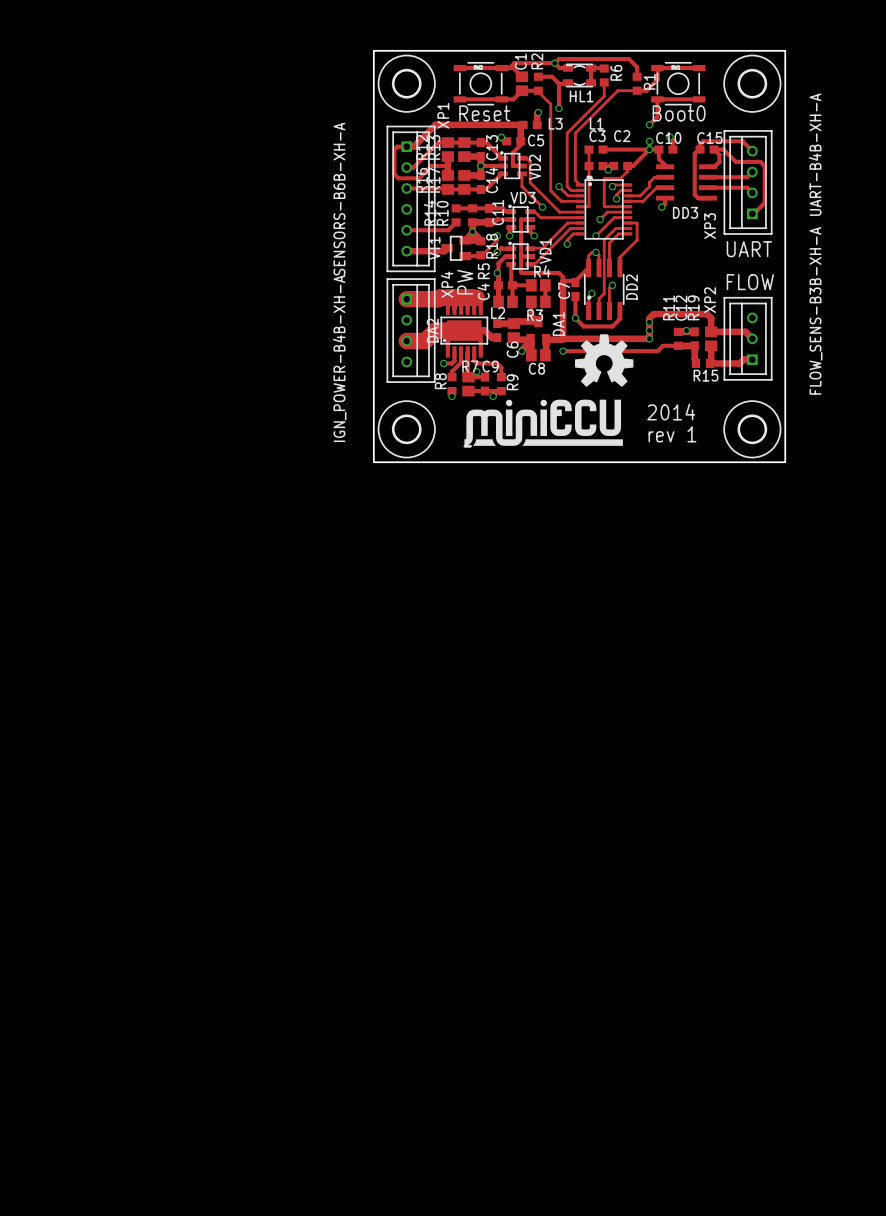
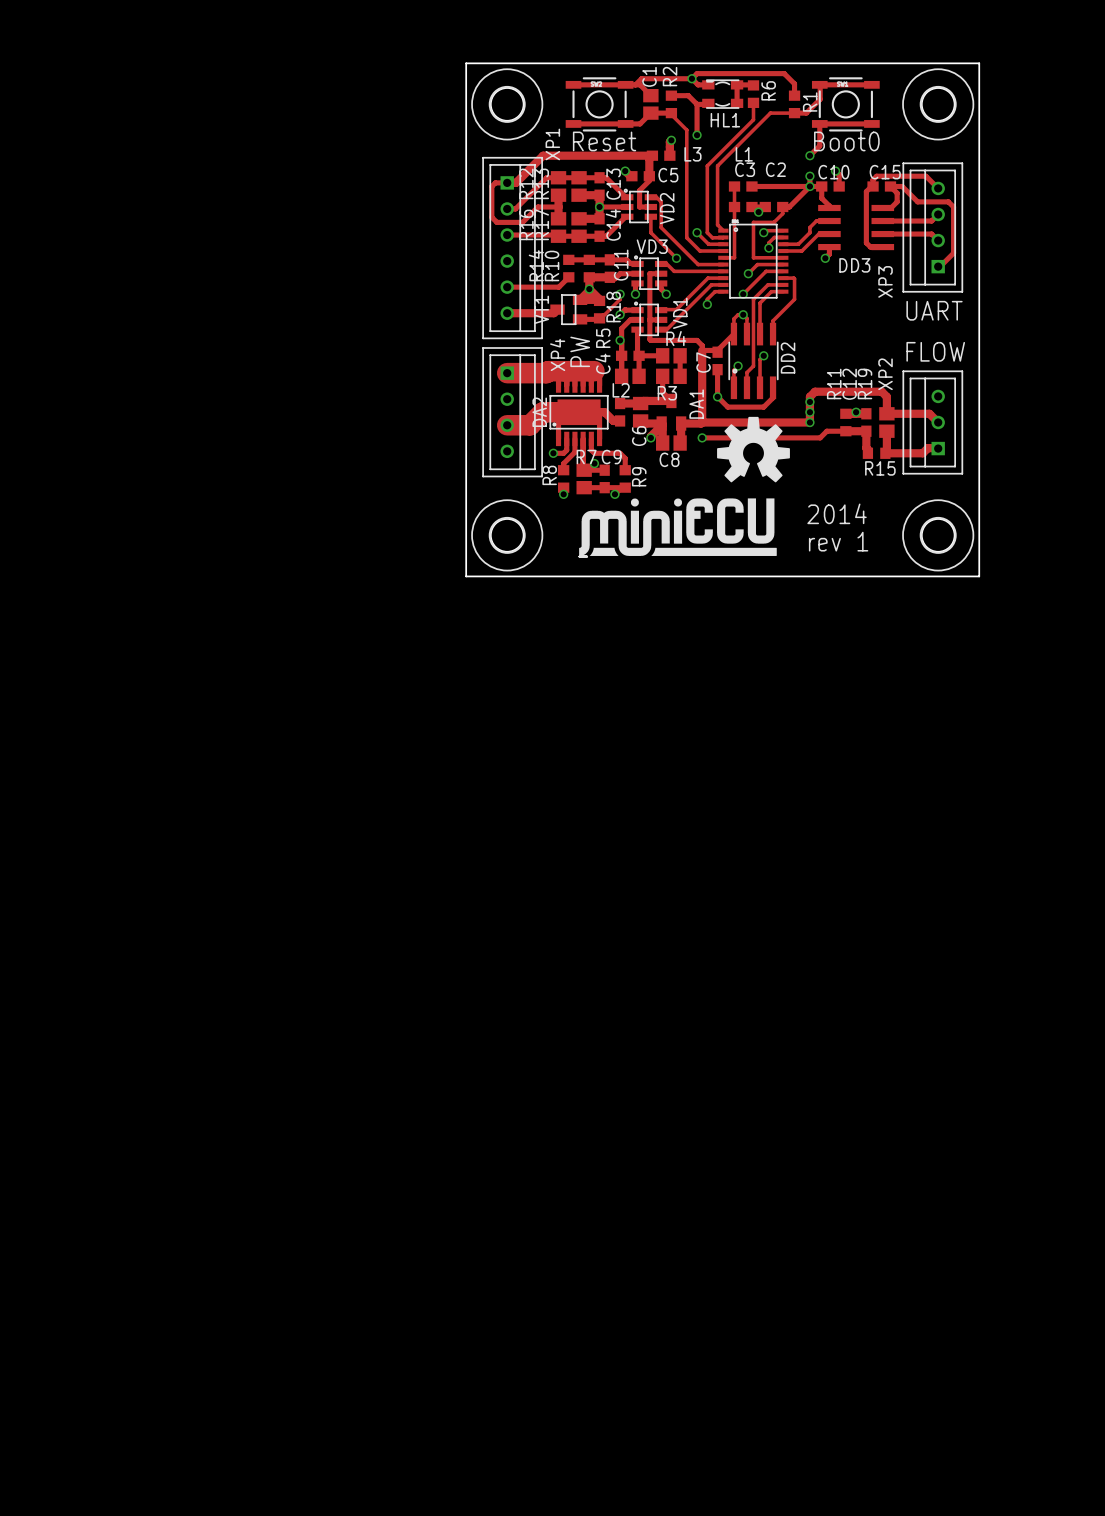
XP3 value: UART-B4B-XH-A (815, 154) -> none
XP1 value: SENSORS-B6B-XH-A (339, 199) -> none
XP2 value: FLOW_SENS-B3B-XH-A (816, 310) -> none
XP4 value: IGN_POWER-B4B-XH-A (339, 358) -> none

